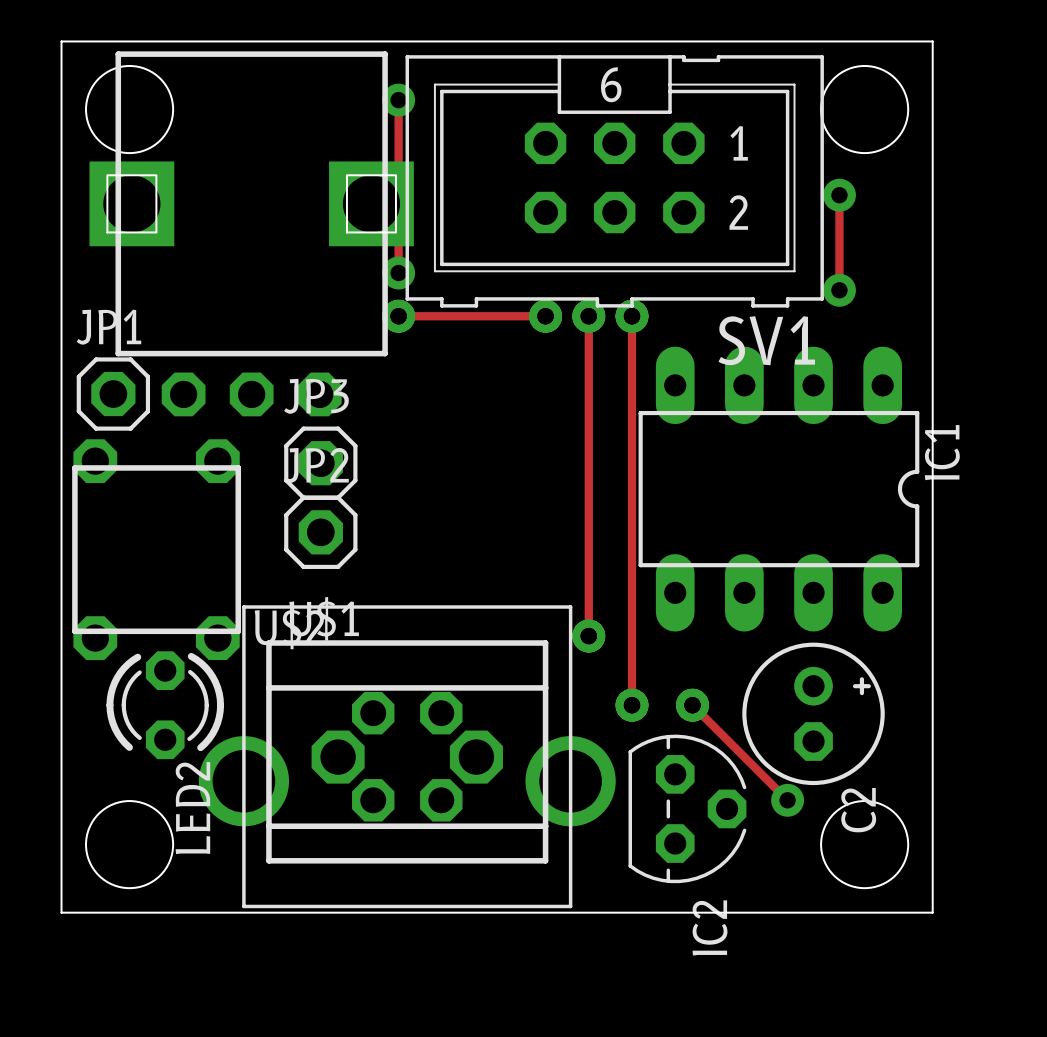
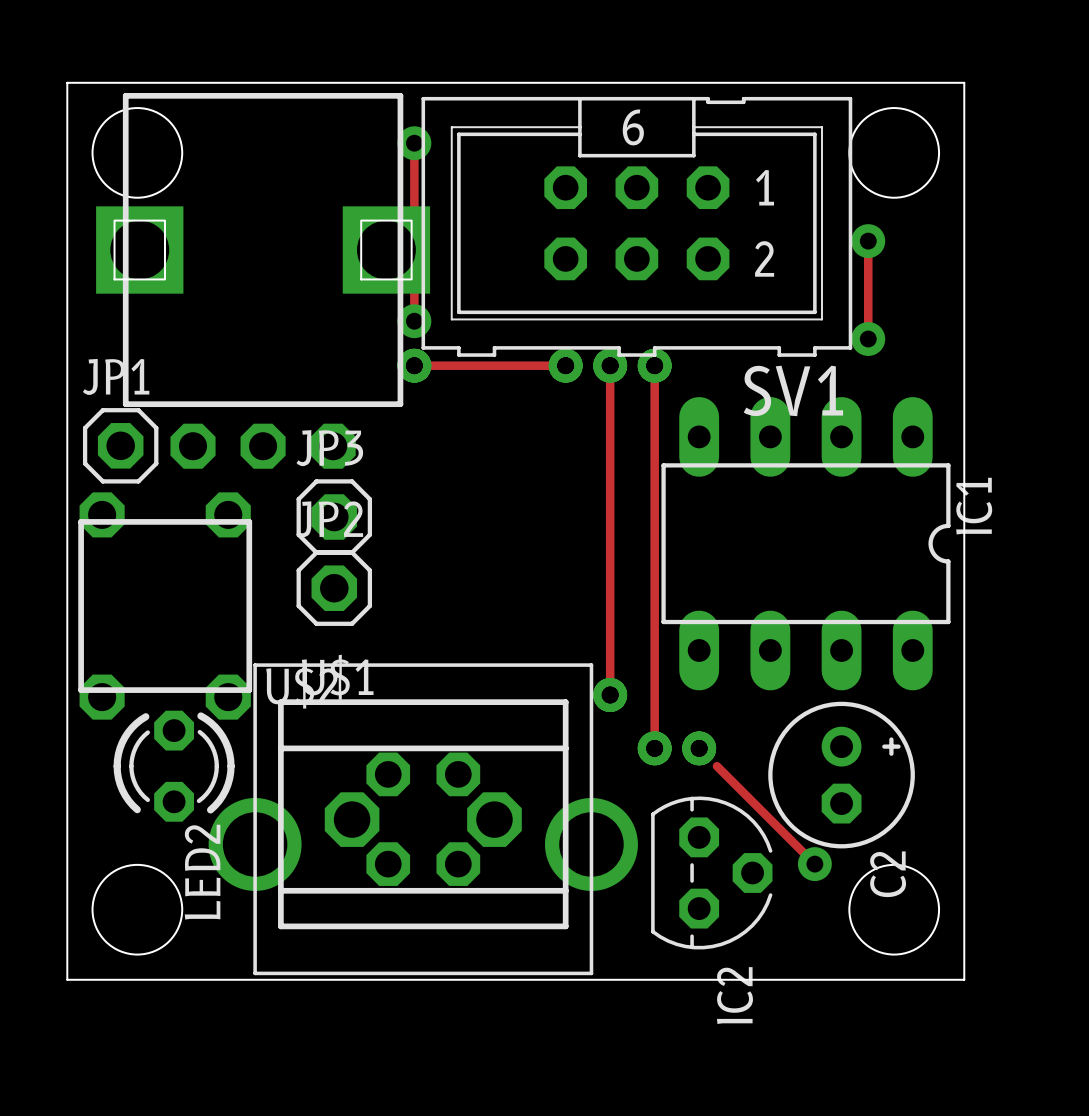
via position: (632, 705) -> (654, 748)
via position: (692, 705) -> (699, 748)

